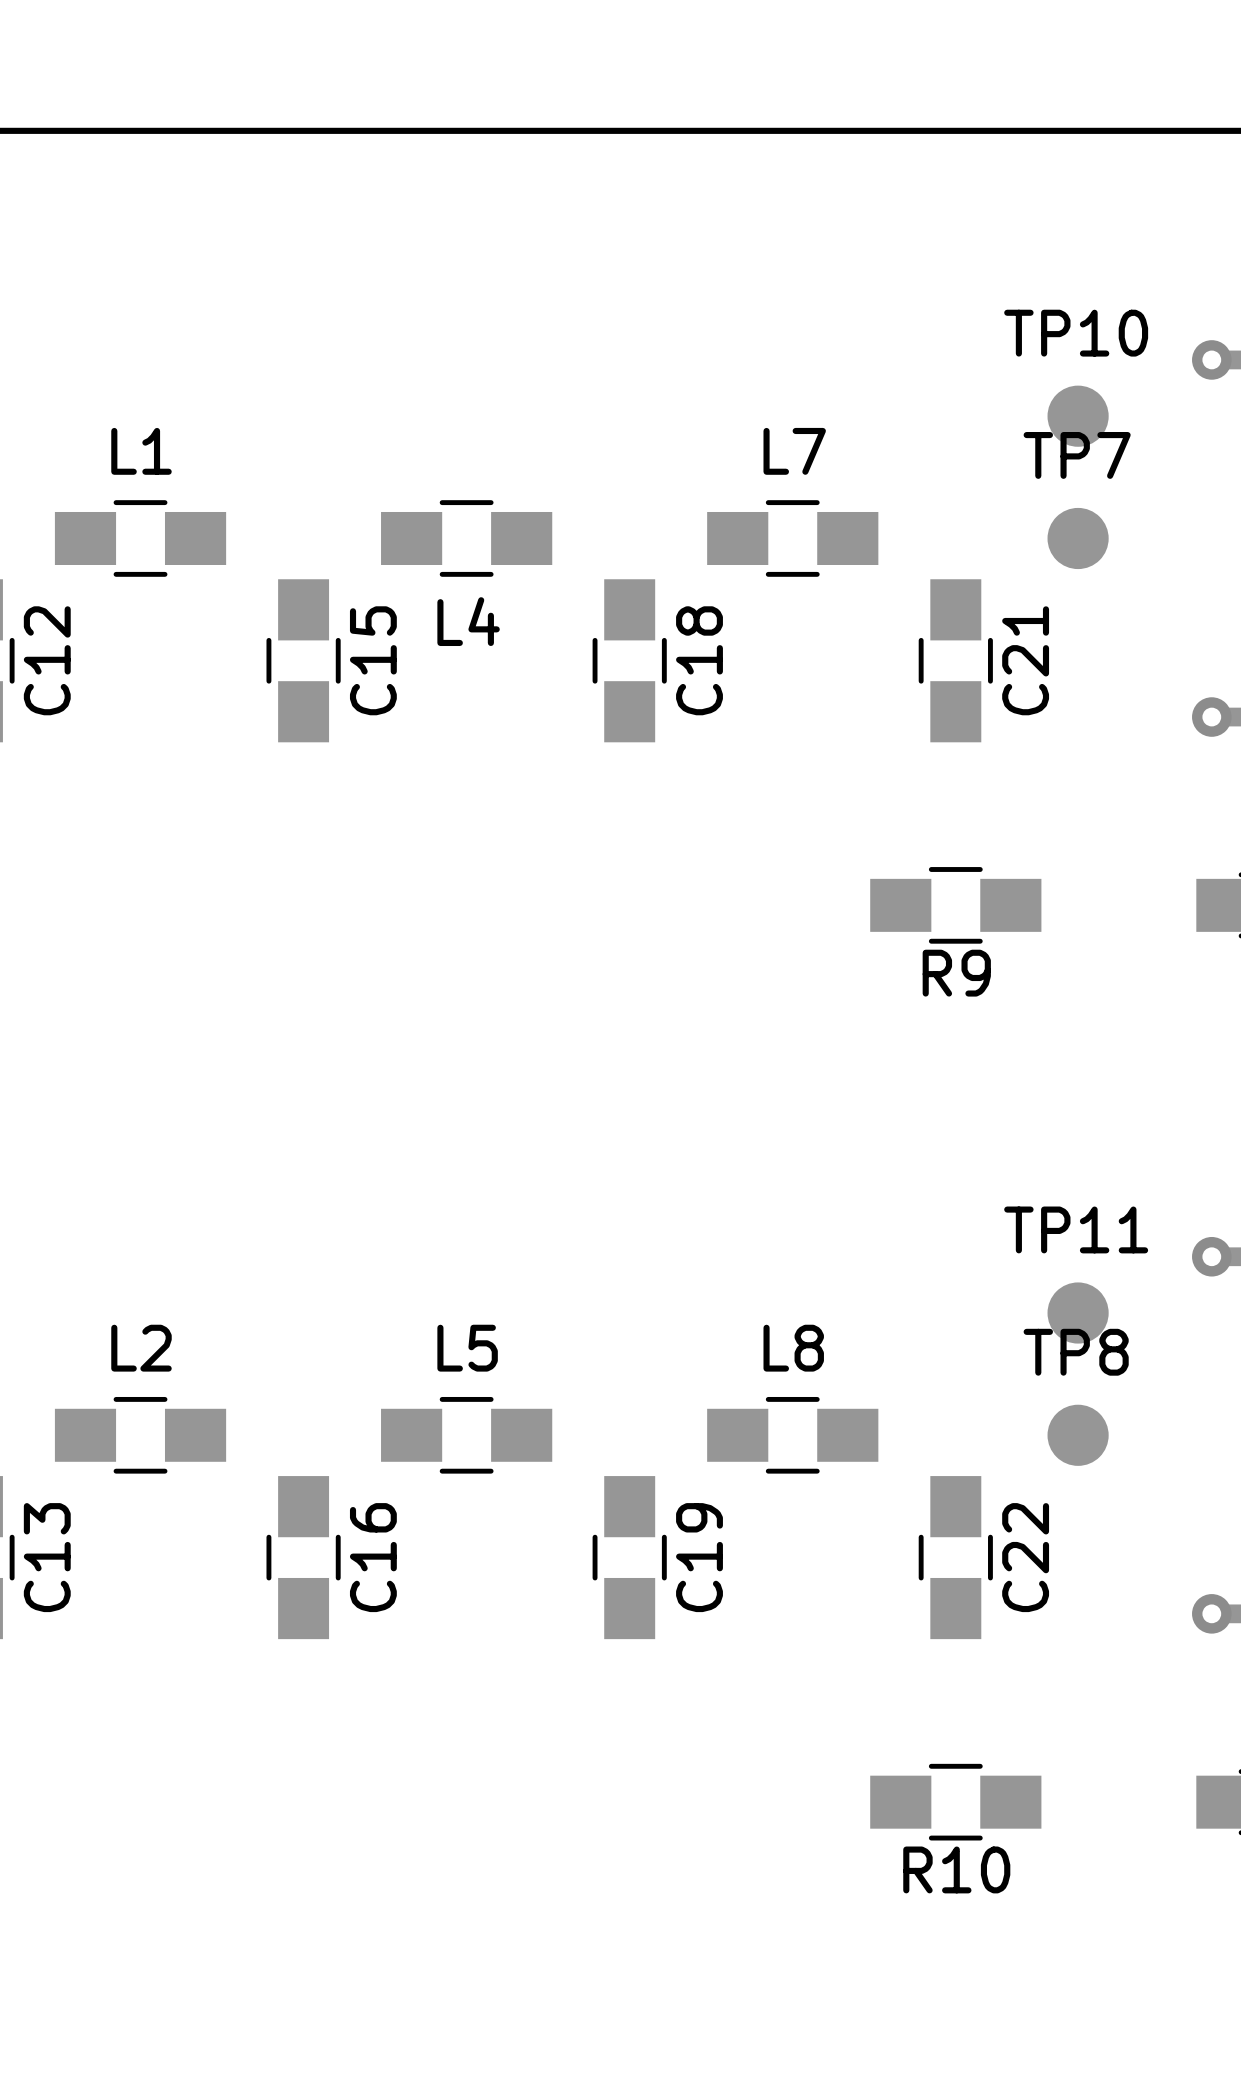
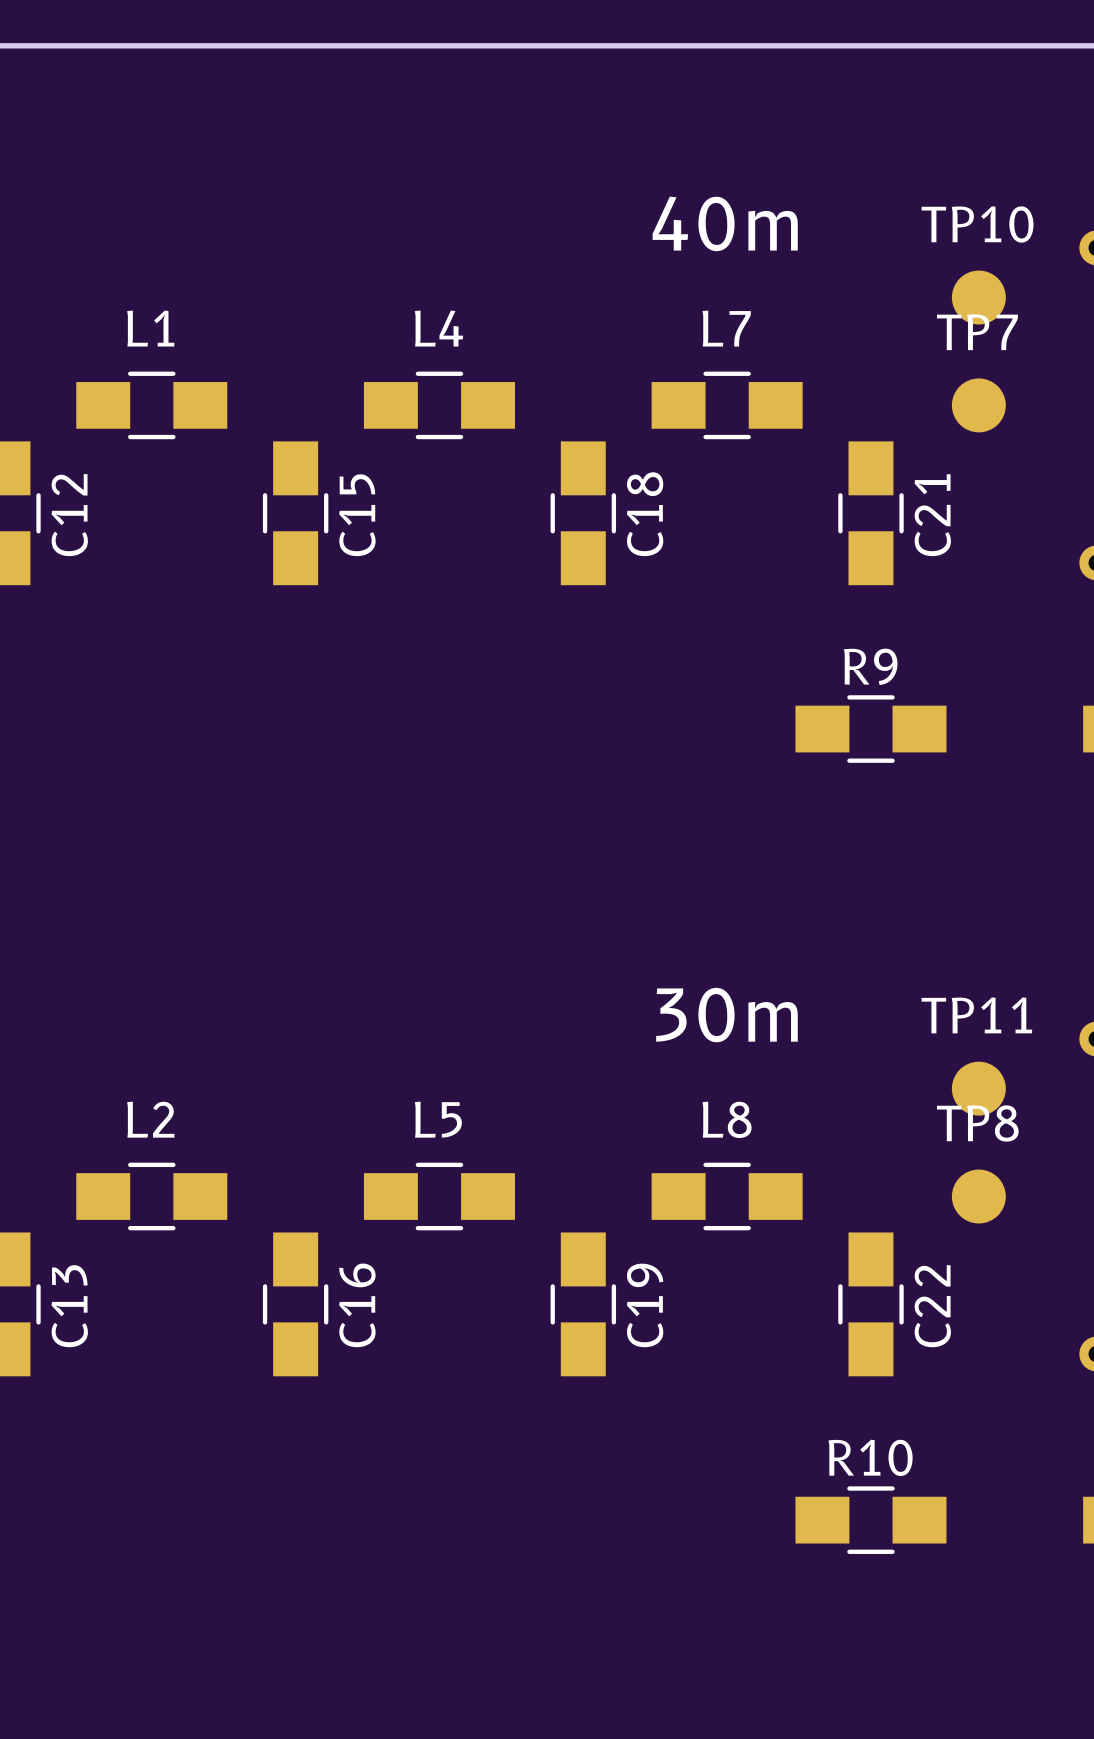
text: none -> 40m (725, 223)
L4 name position: L4 (468, 621) -> L4 (438, 328)
R9 name position: R9 (956, 973) -> R9 (870, 666)
text: none -> 30m (726, 1015)
R10 name position: R10 (956, 1869) -> R10 (870, 1457)

